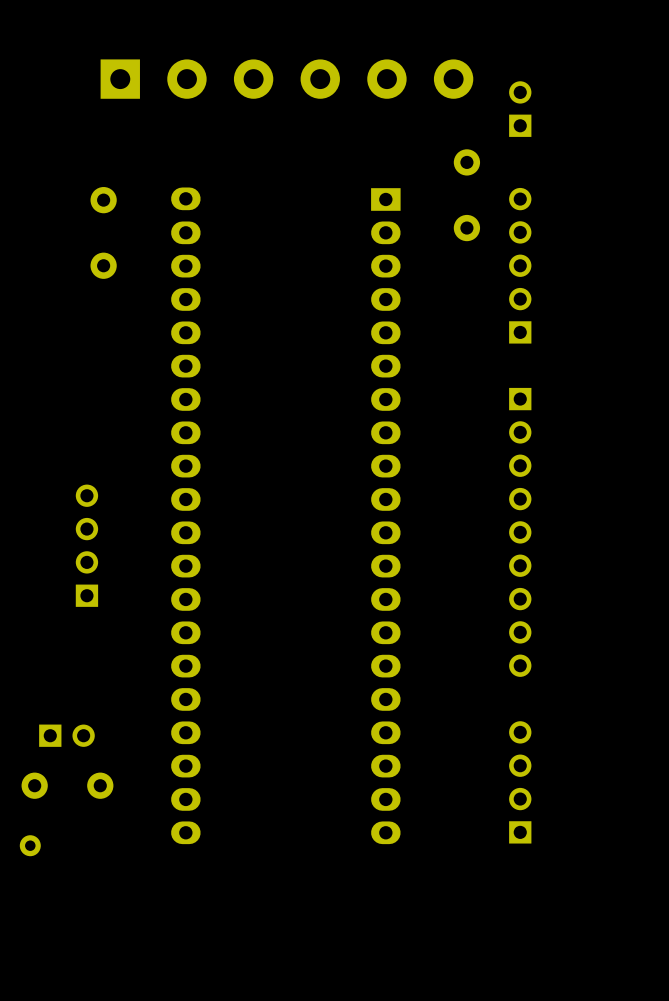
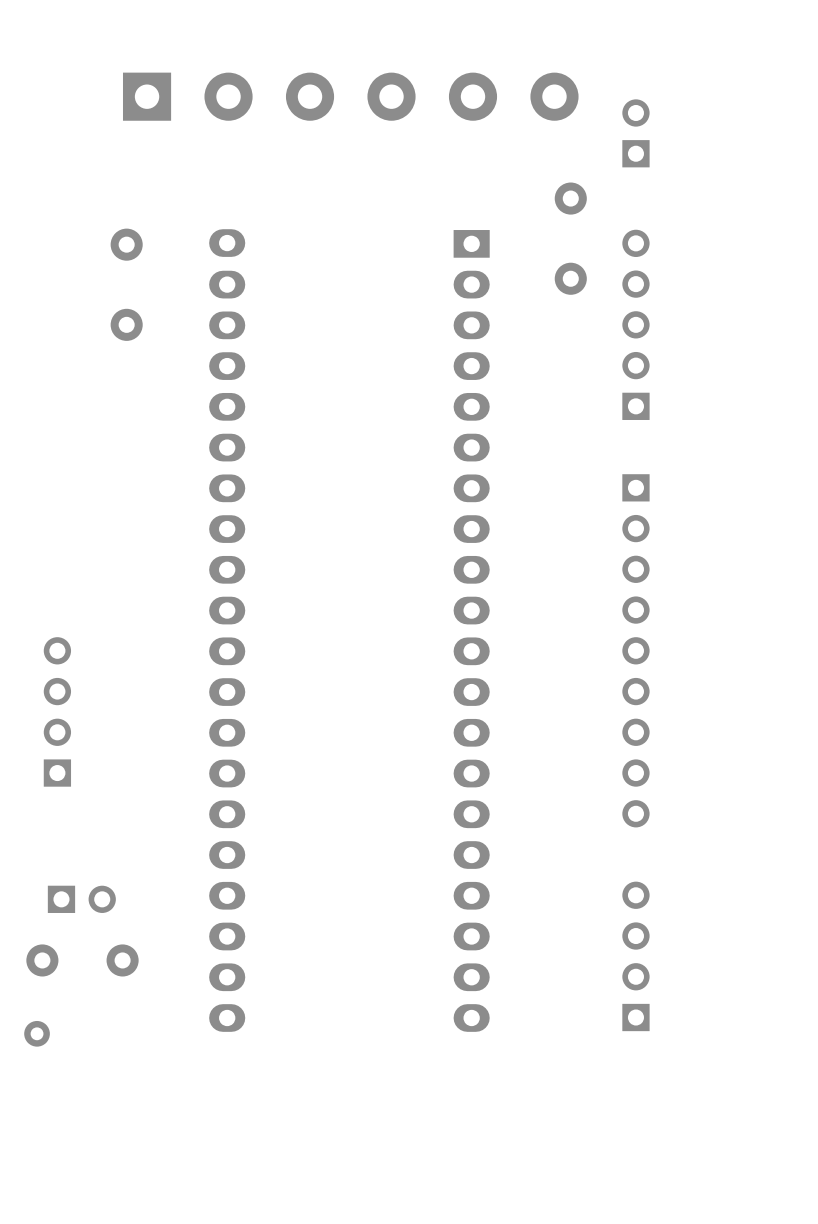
part position: (86, 545) -> (57, 711)

